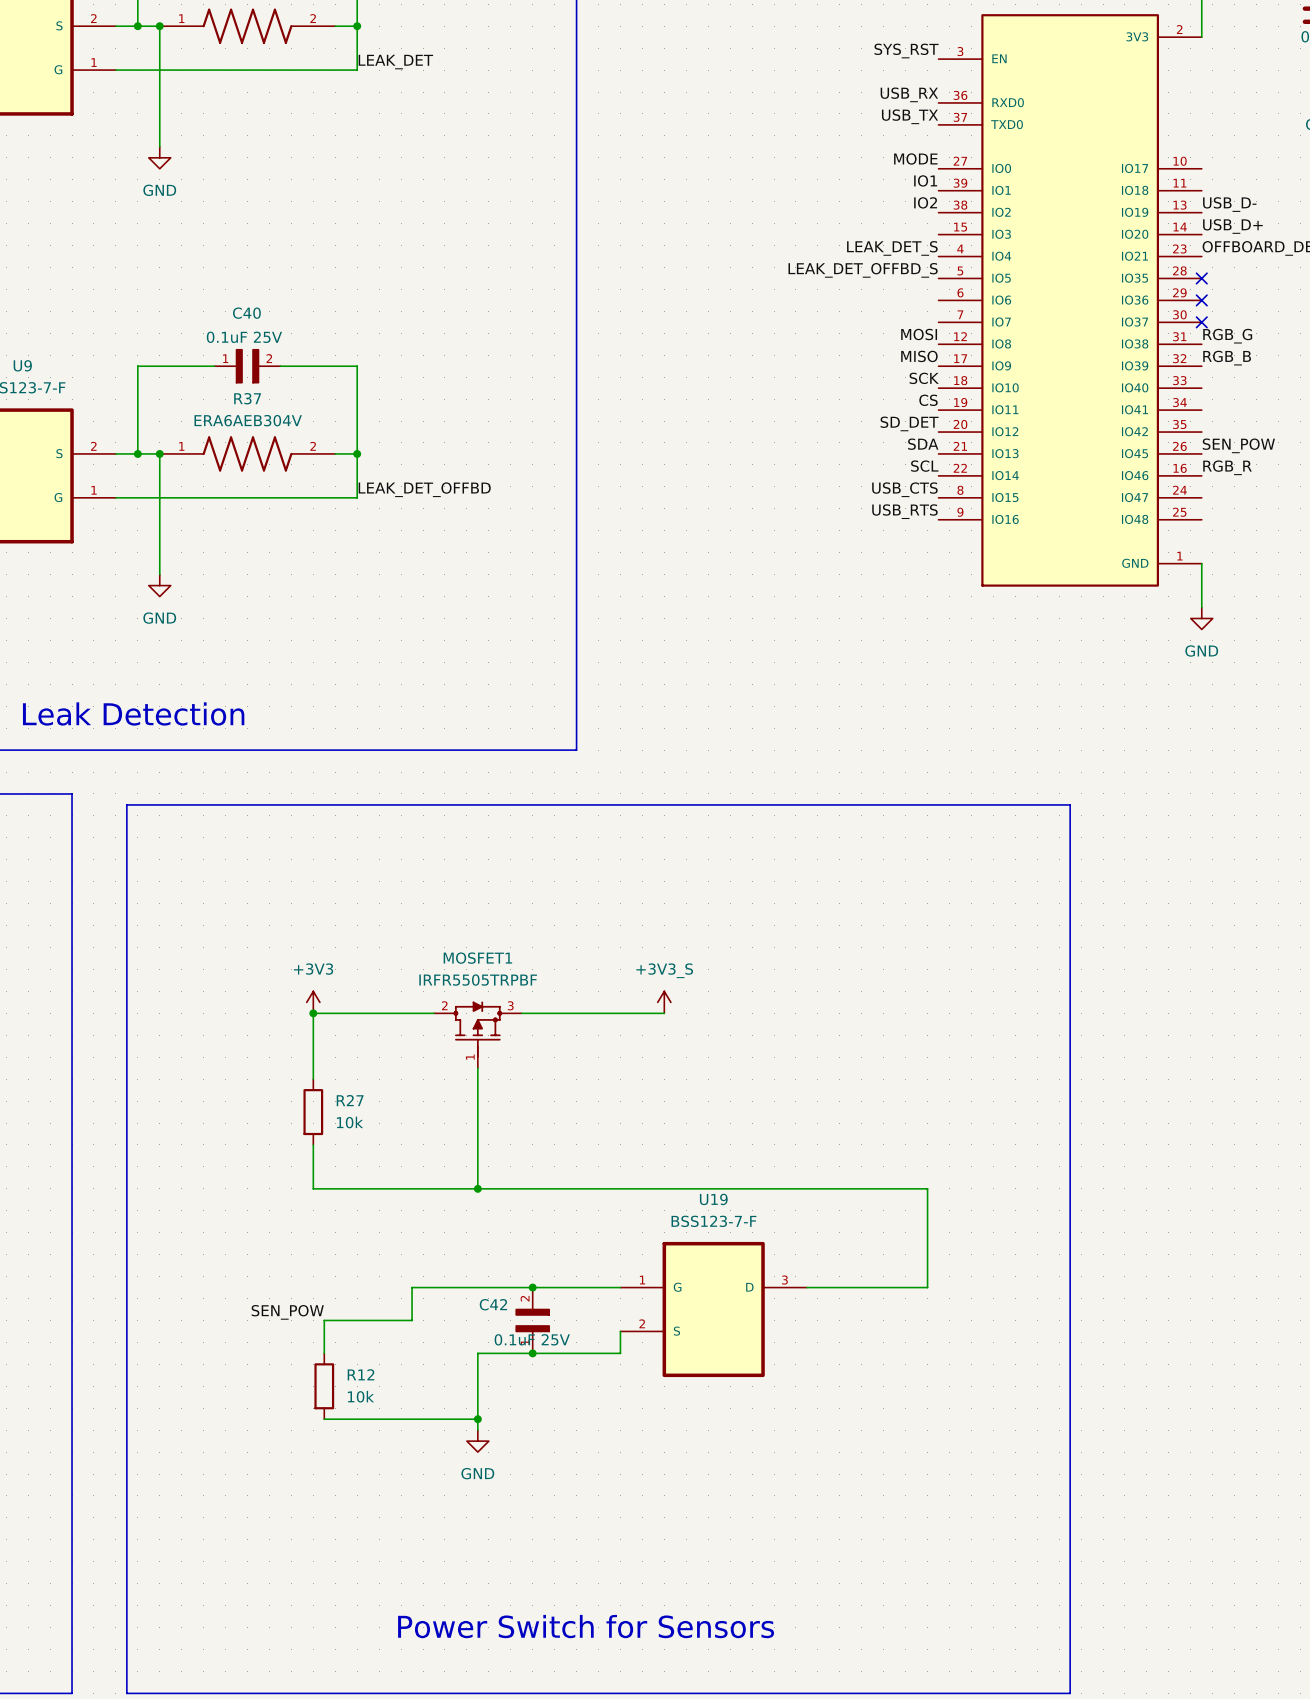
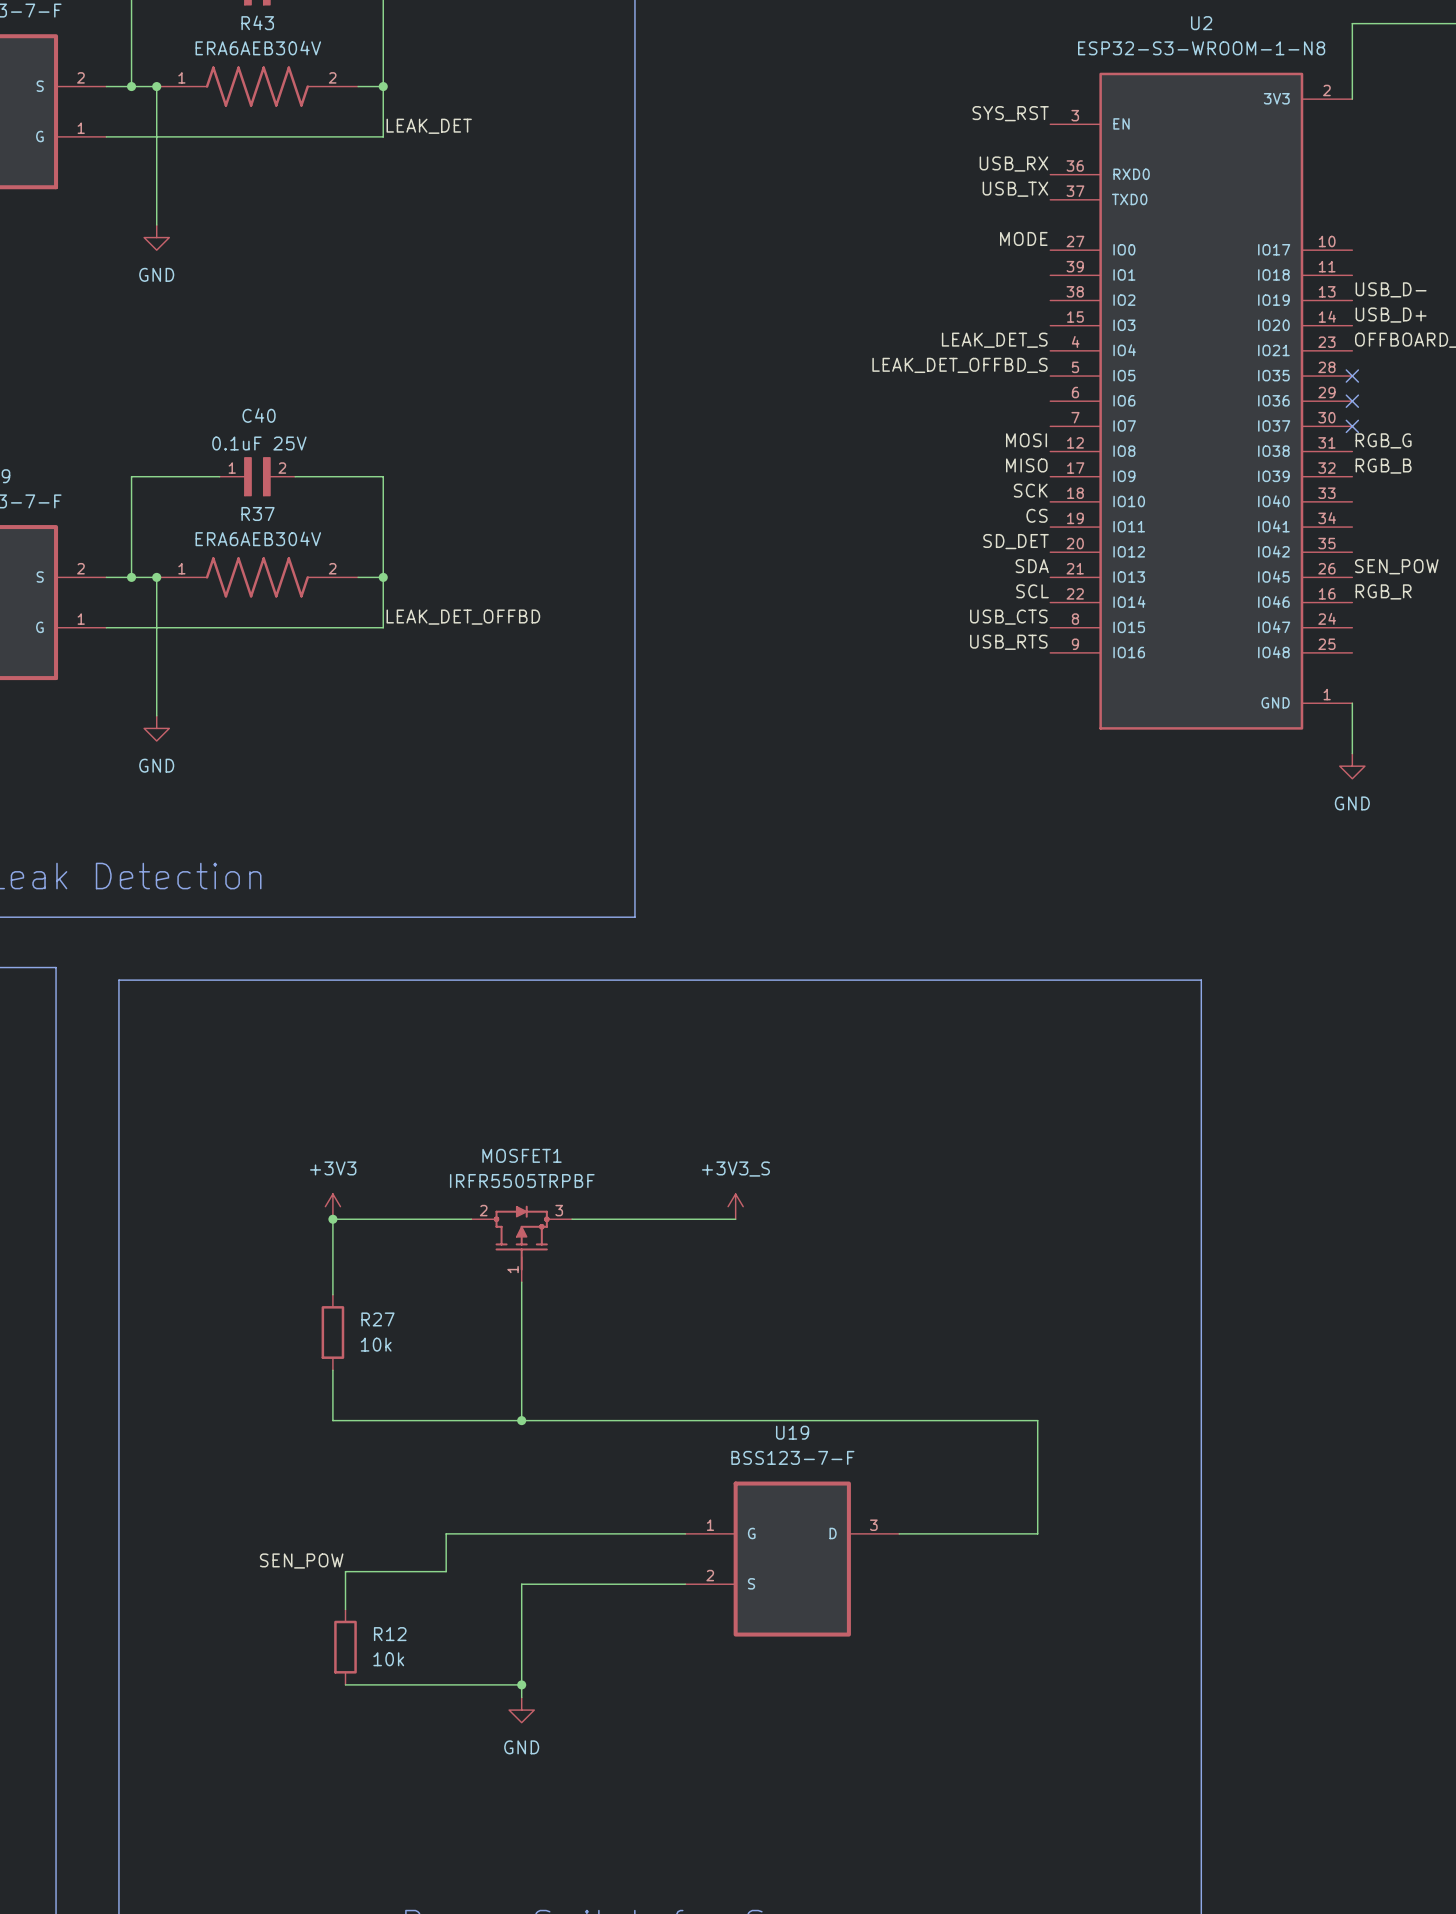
label: IO1 (925, 180) -> none
label: IO2 (925, 202) -> none
junction: (532, 1287) -> none
C42: 0.1uF 25V (532, 1320) -> none
wire: (620, 1331) (620, 1353) (477, 1353) -> (685, 1584) (521, 1584) (521, 1609)
junction: (532, 1353) -> none

